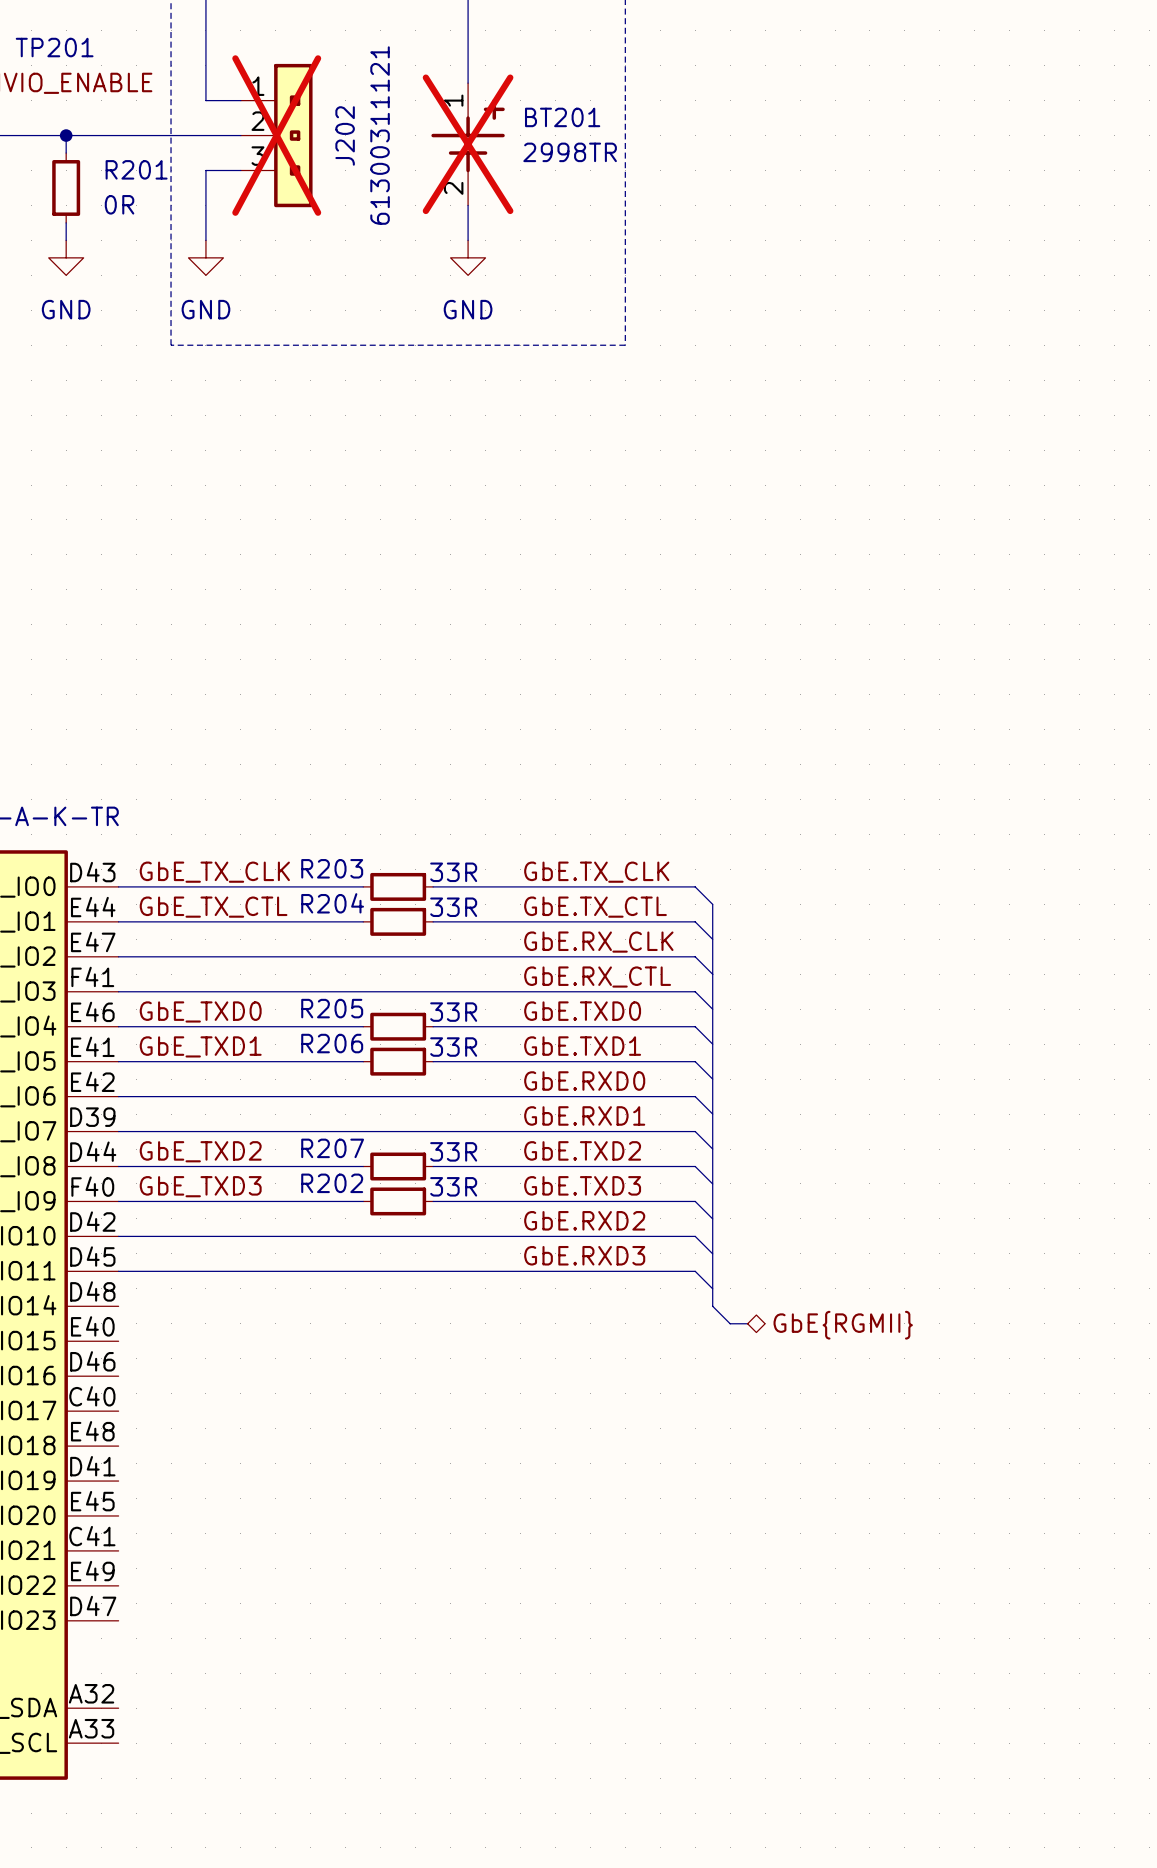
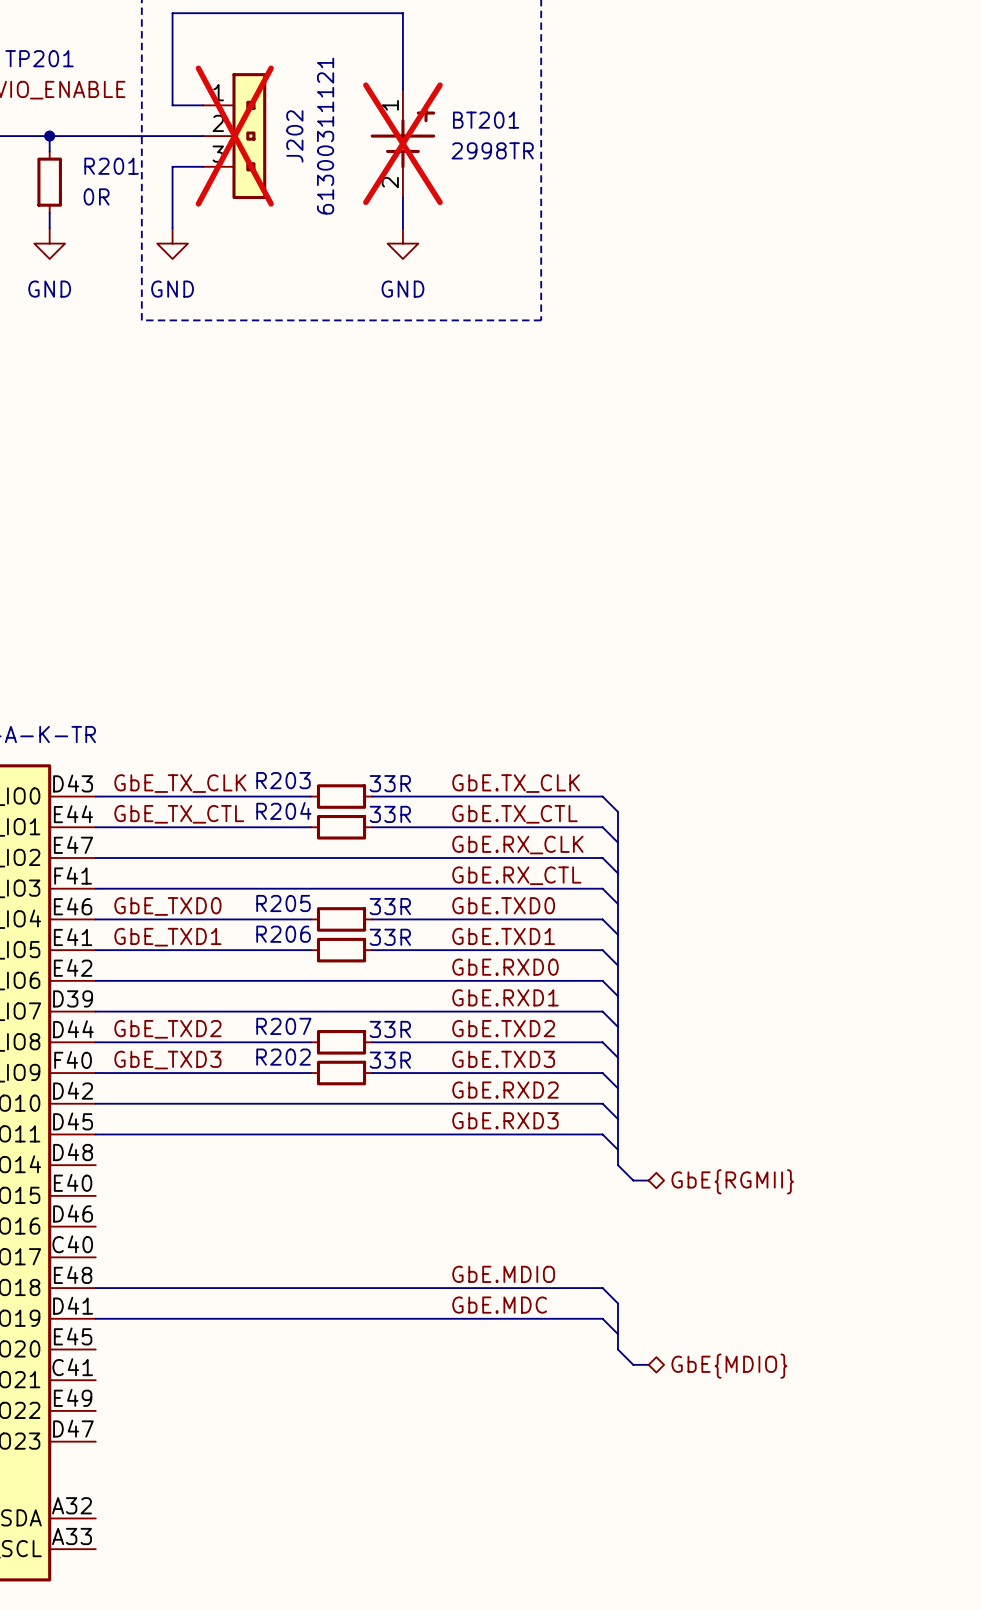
label: none -> GbE.MDIO (503, 1274)
wire: none -> (95, 1288) (602, 1288) (617, 1303)
bus: none -> (617, 1303) (617, 1349) (633, 1364) (648, 1364)
label: none -> GbE.MDC (499, 1305)
wire: none -> (95, 1318) (602, 1318) (617, 1334)
hierarchical label: none -> GbE{MDIO} (729, 1366)

